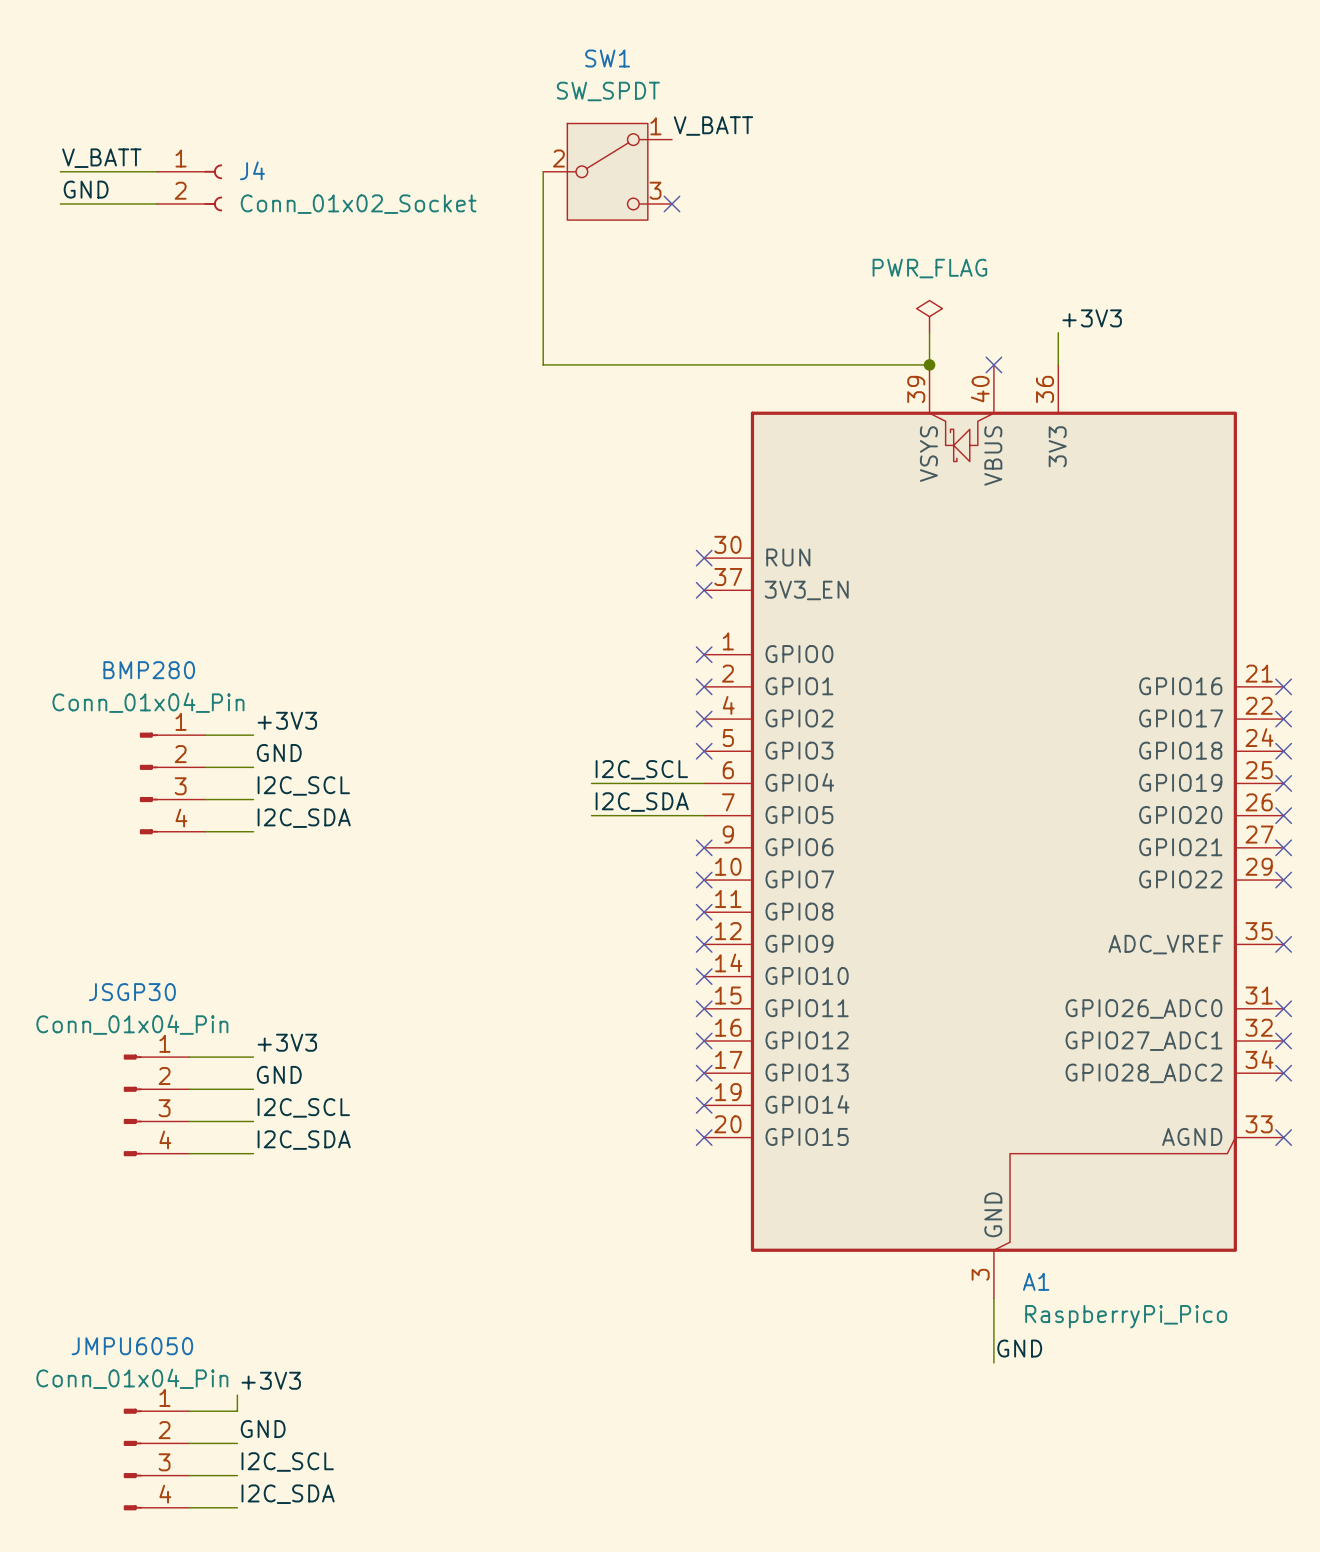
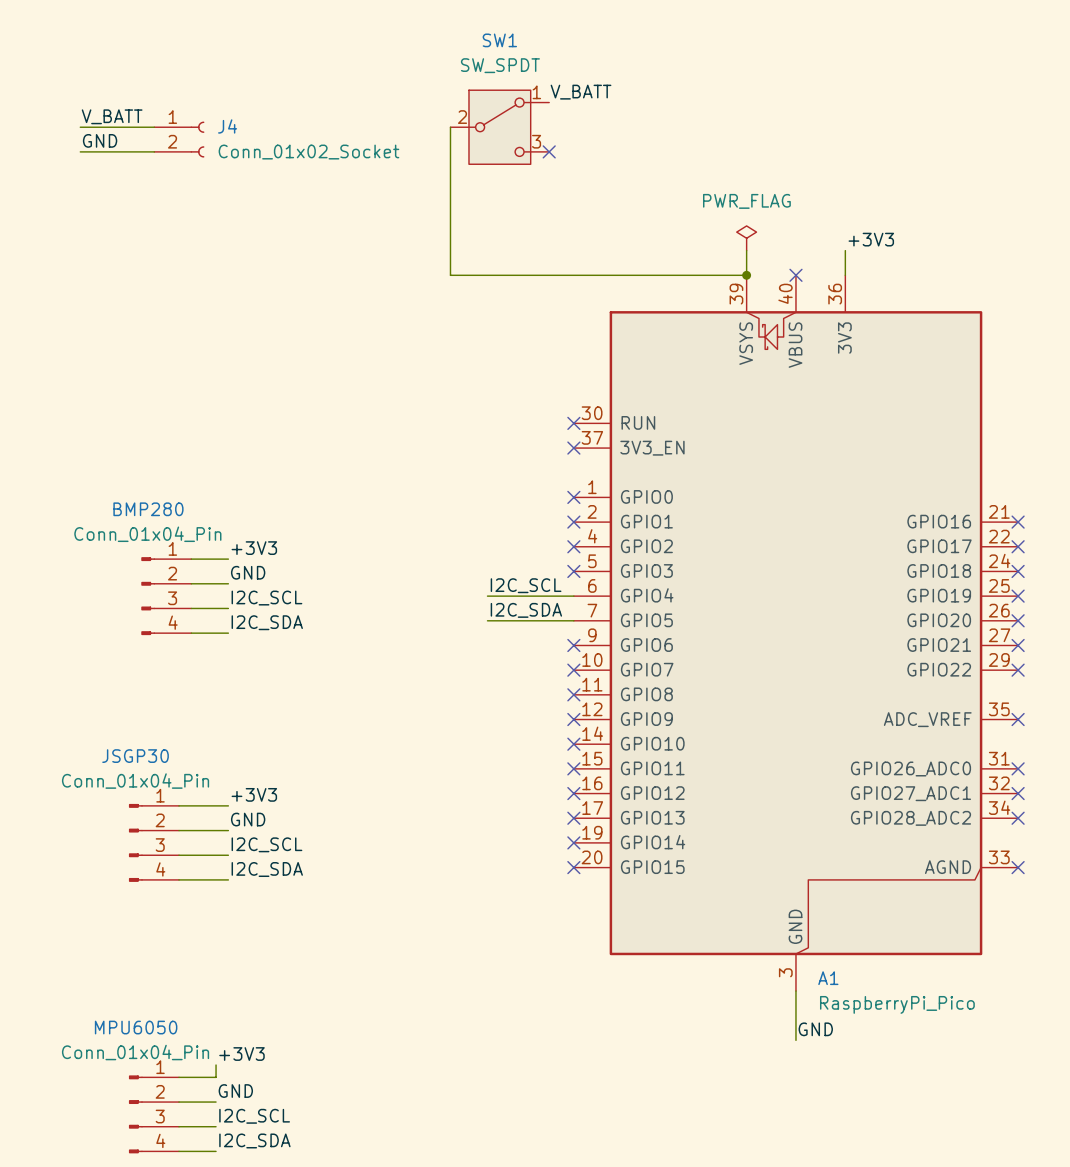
JMPU6050 name: JMPU6050 (132, 1346) -> MPU6050 (136, 1027)

